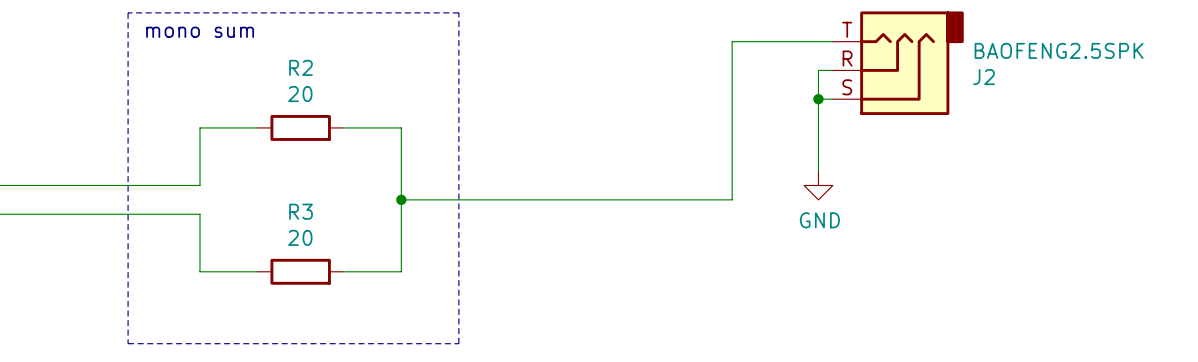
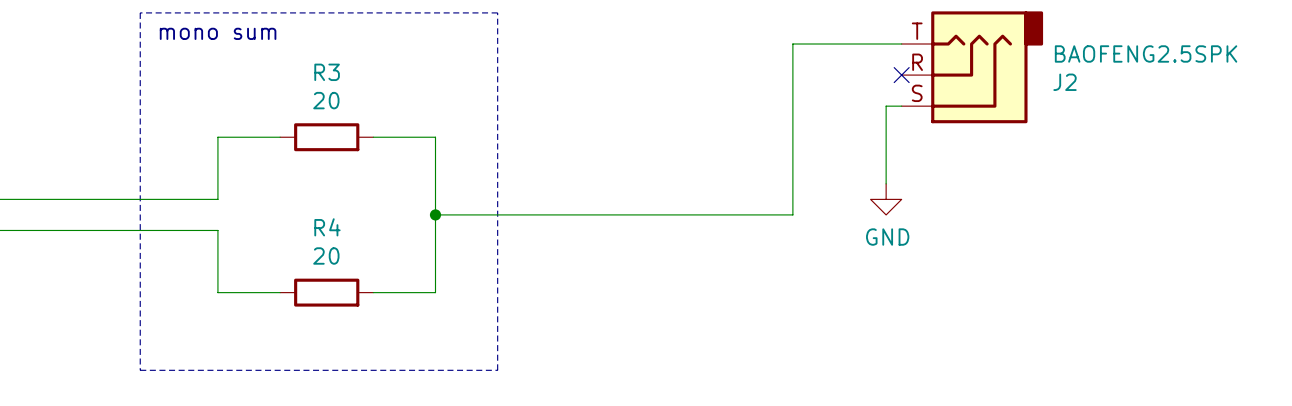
R2 name: R2 (301, 67) -> R3 (327, 72)
wire: (832, 70) (818, 70) (818, 99) -> none
no-connect mark: none -> (901, 75)
junction: (818, 99) -> none
R3 name: R3 (301, 211) -> R4 (327, 227)

